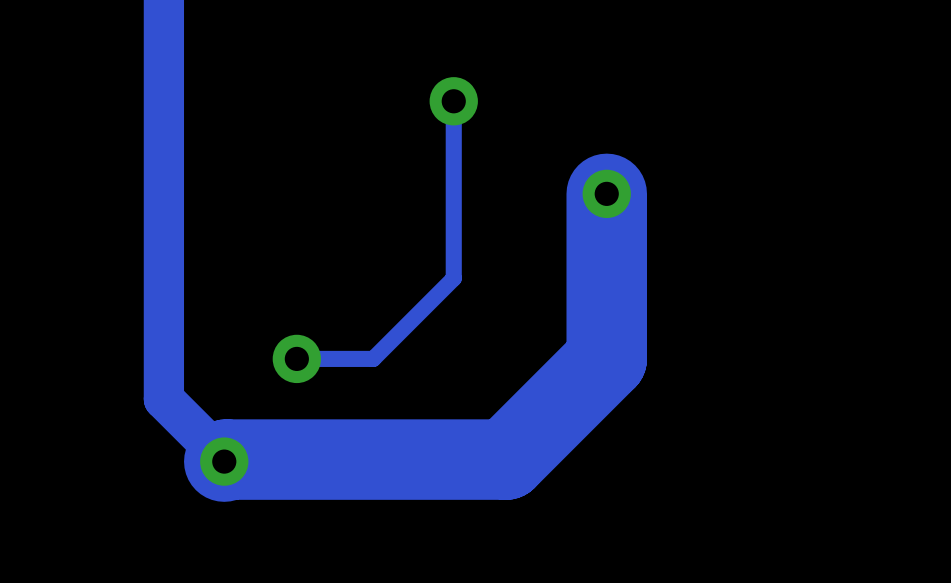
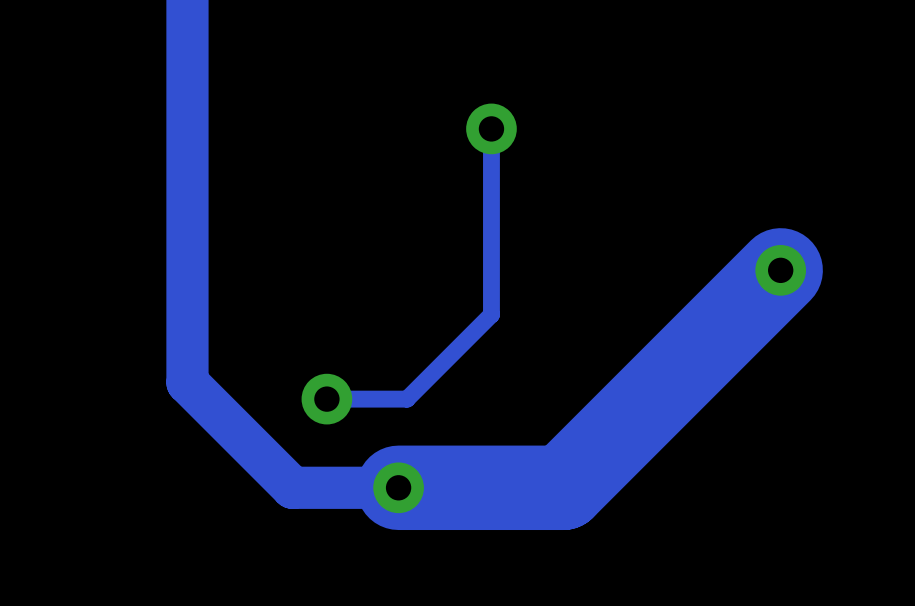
track: (606, 193) (606, 358) -> (780, 270) (651, 399)
via position: (606, 193) -> (780, 270)
track: (163, 343) (163, 399) (224, 461) (226, 459) (506, 459) (522, 443) -> (187, 382) (292, 487) (563, 487)
via position: (224, 461) -> (398, 487)

